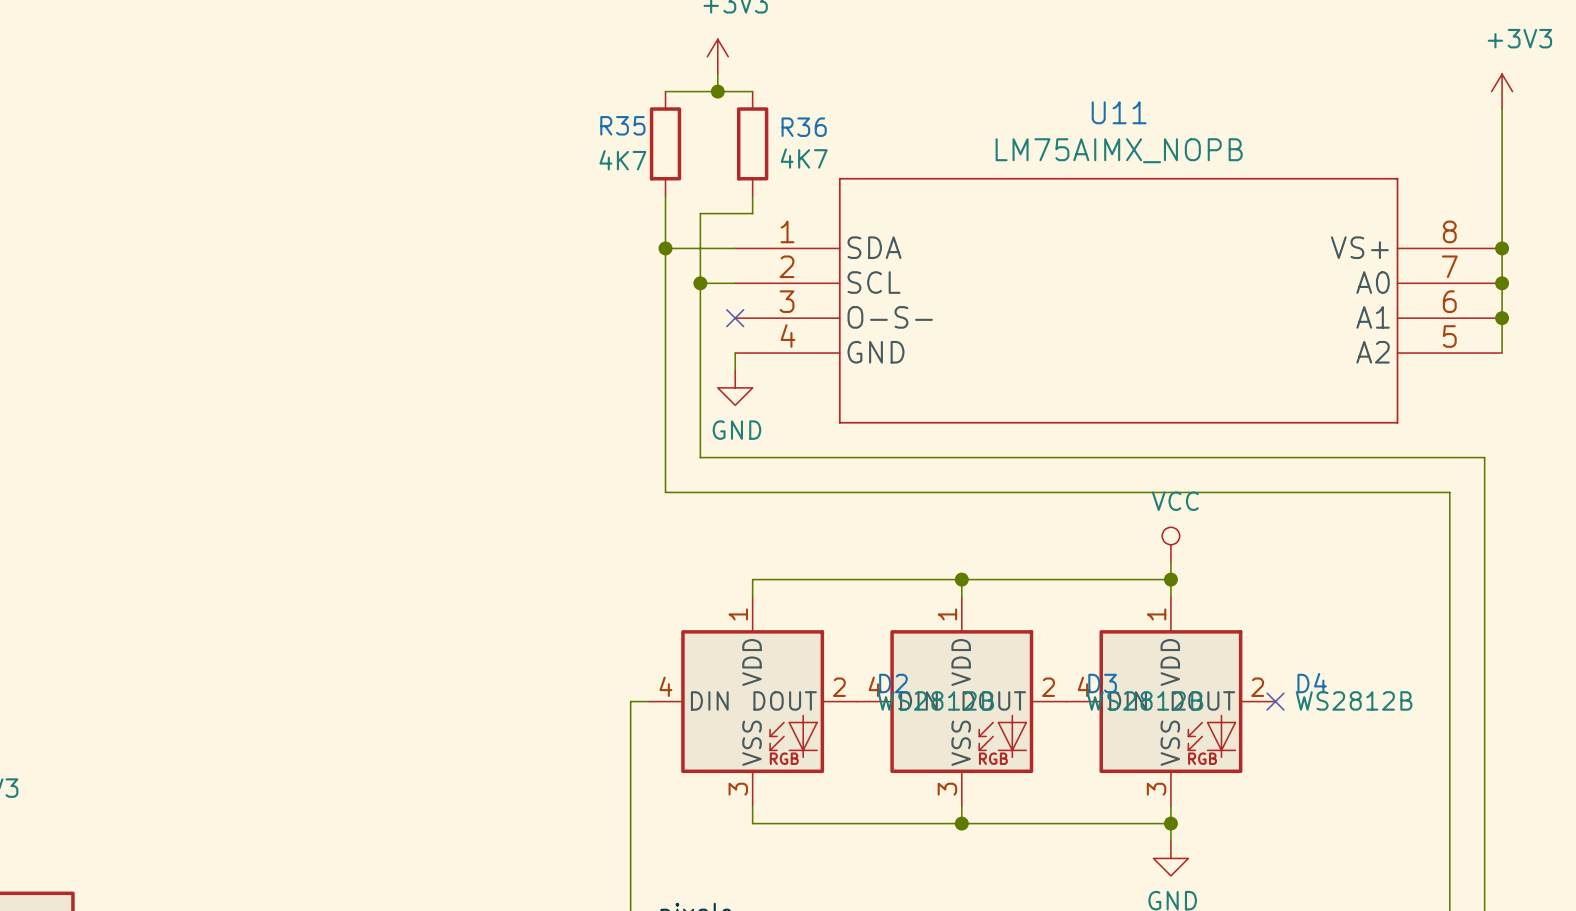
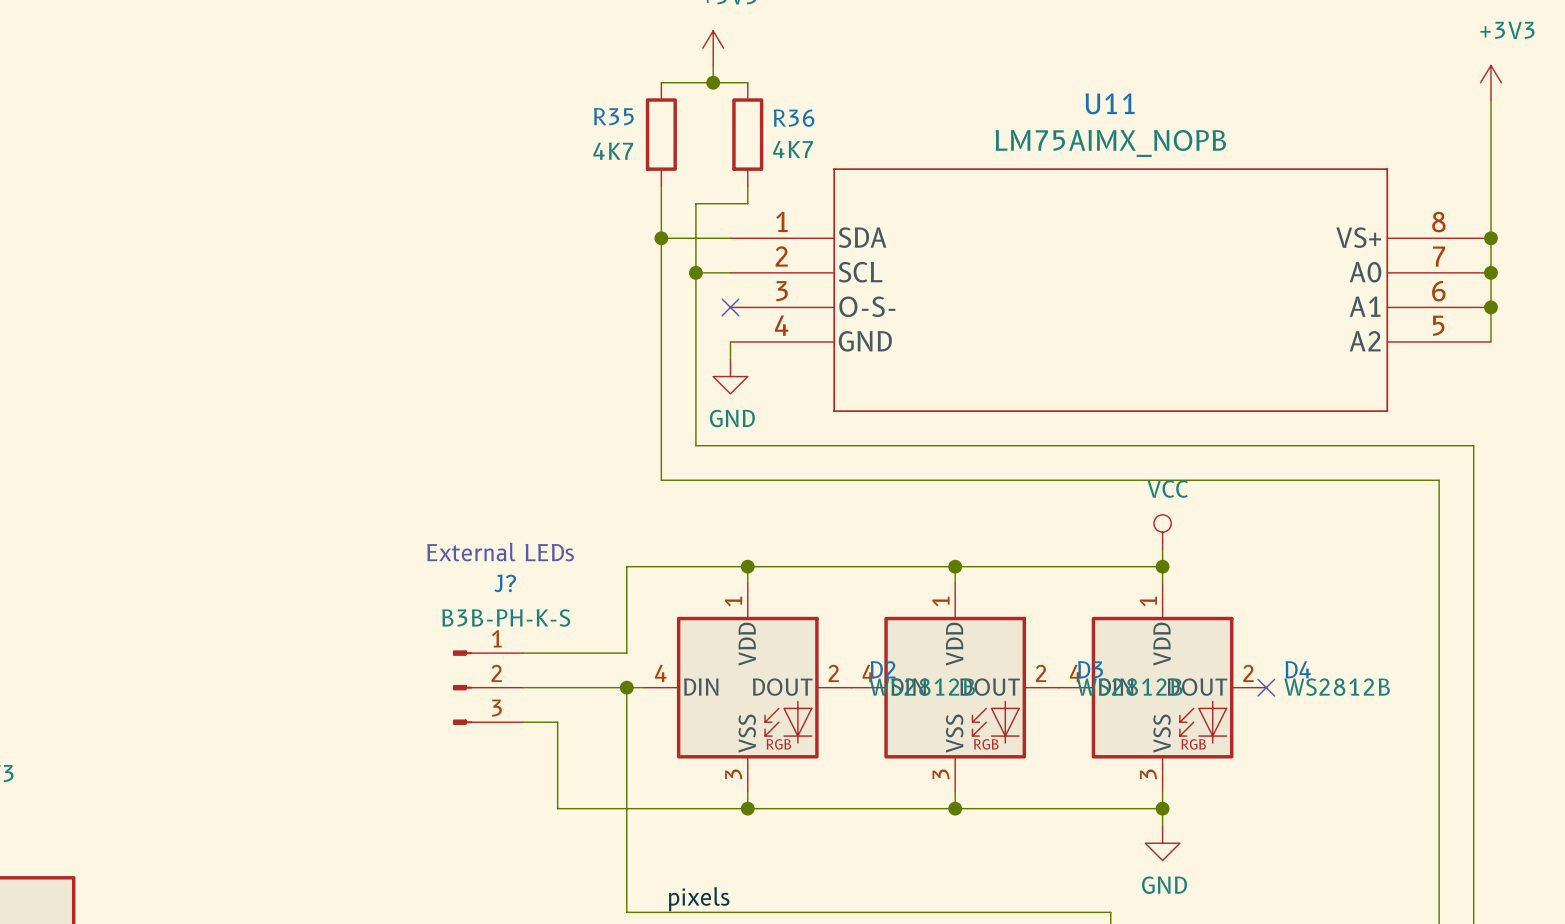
text: none -> External LEDs (500, 552)
wire: none -> (747, 566) (626, 566) (626, 653) (523, 653)
junction: none -> (747, 566)
J?: none -> B3B-PH-K-S (488, 687)
wire: none -> (523, 687) (626, 687)
junction: none -> (626, 687)
wire: none -> (523, 722) (557, 722) (557, 808) (747, 808)
junction: none -> (747, 808)

